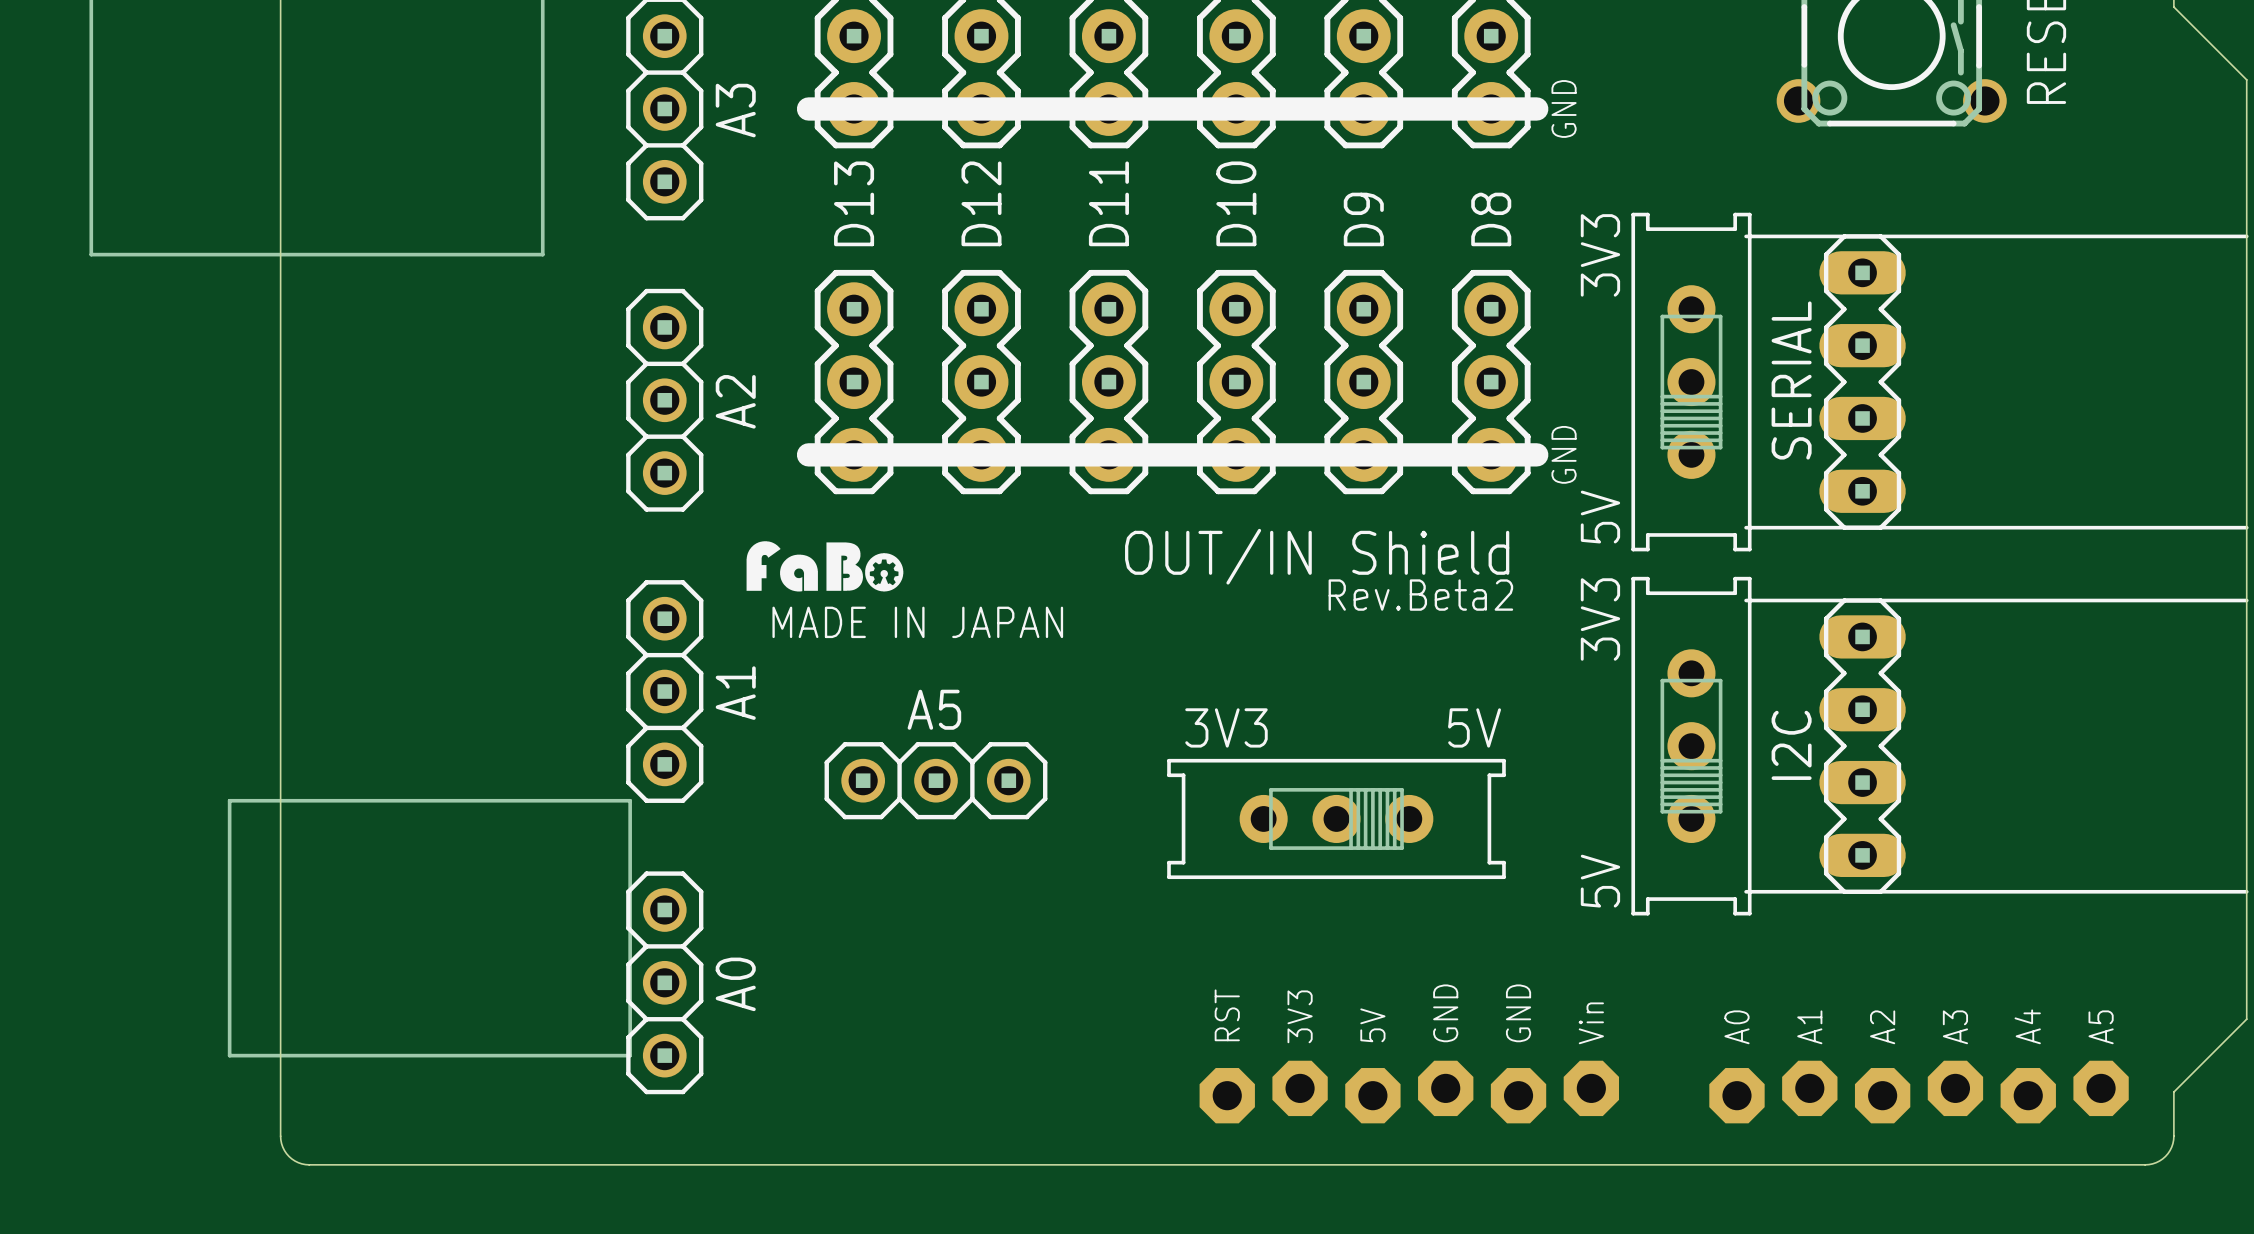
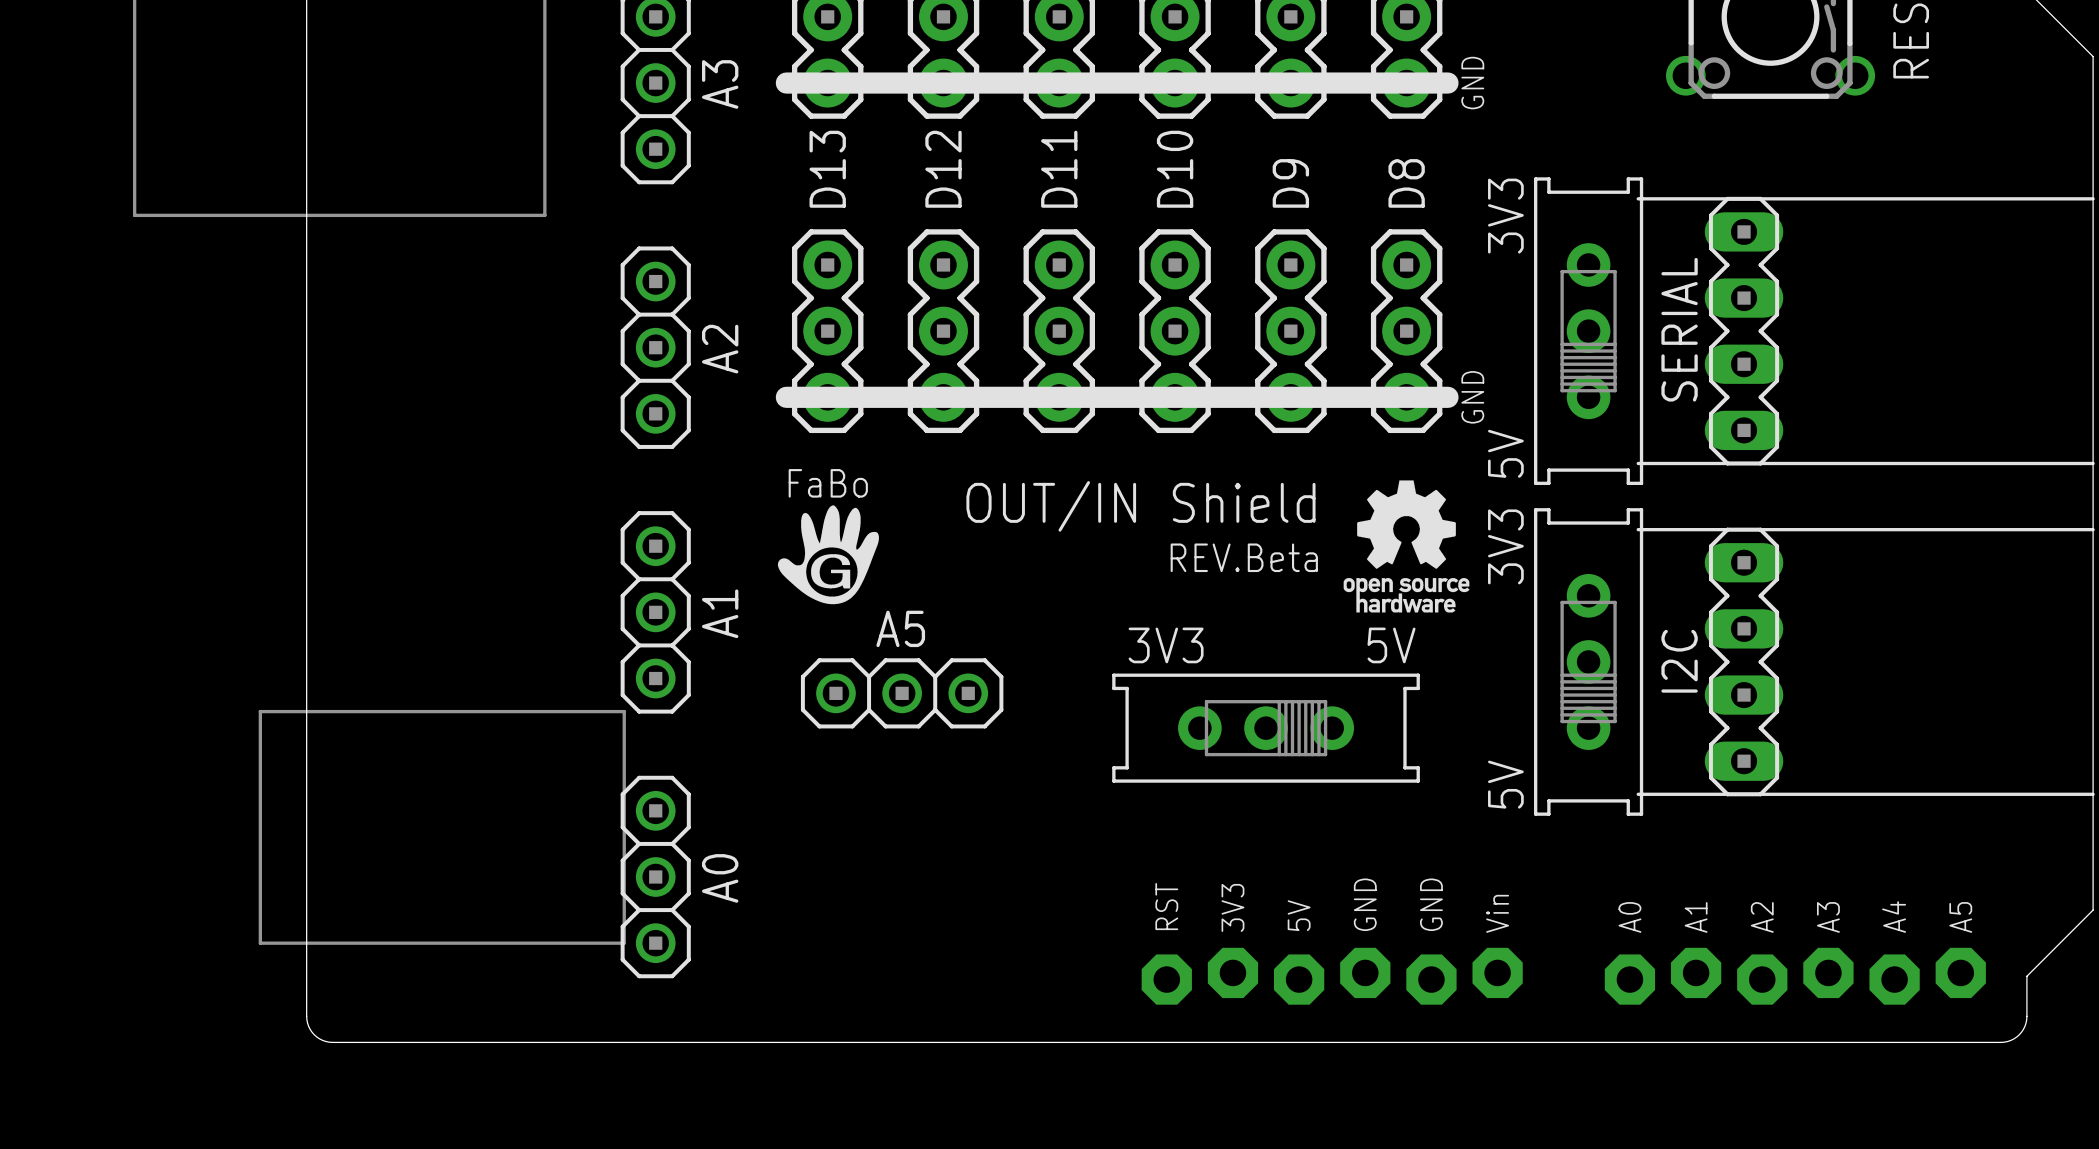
drawing: [746, 541, 904, 592] -> none
drawing: none -> [1343, 480, 1470, 613]
text: none -> FaBo (828, 483)
text position: OUT/IN Shield (1317, 556) -> OUT/IN Shield (1140, 506)
drawing: none -> [777, 505, 879, 605]
text: Rev.Beta2 (1420, 595) -> REV.Beta (1244, 557)
text: MADE IN JAPAN (917, 622) -> none

